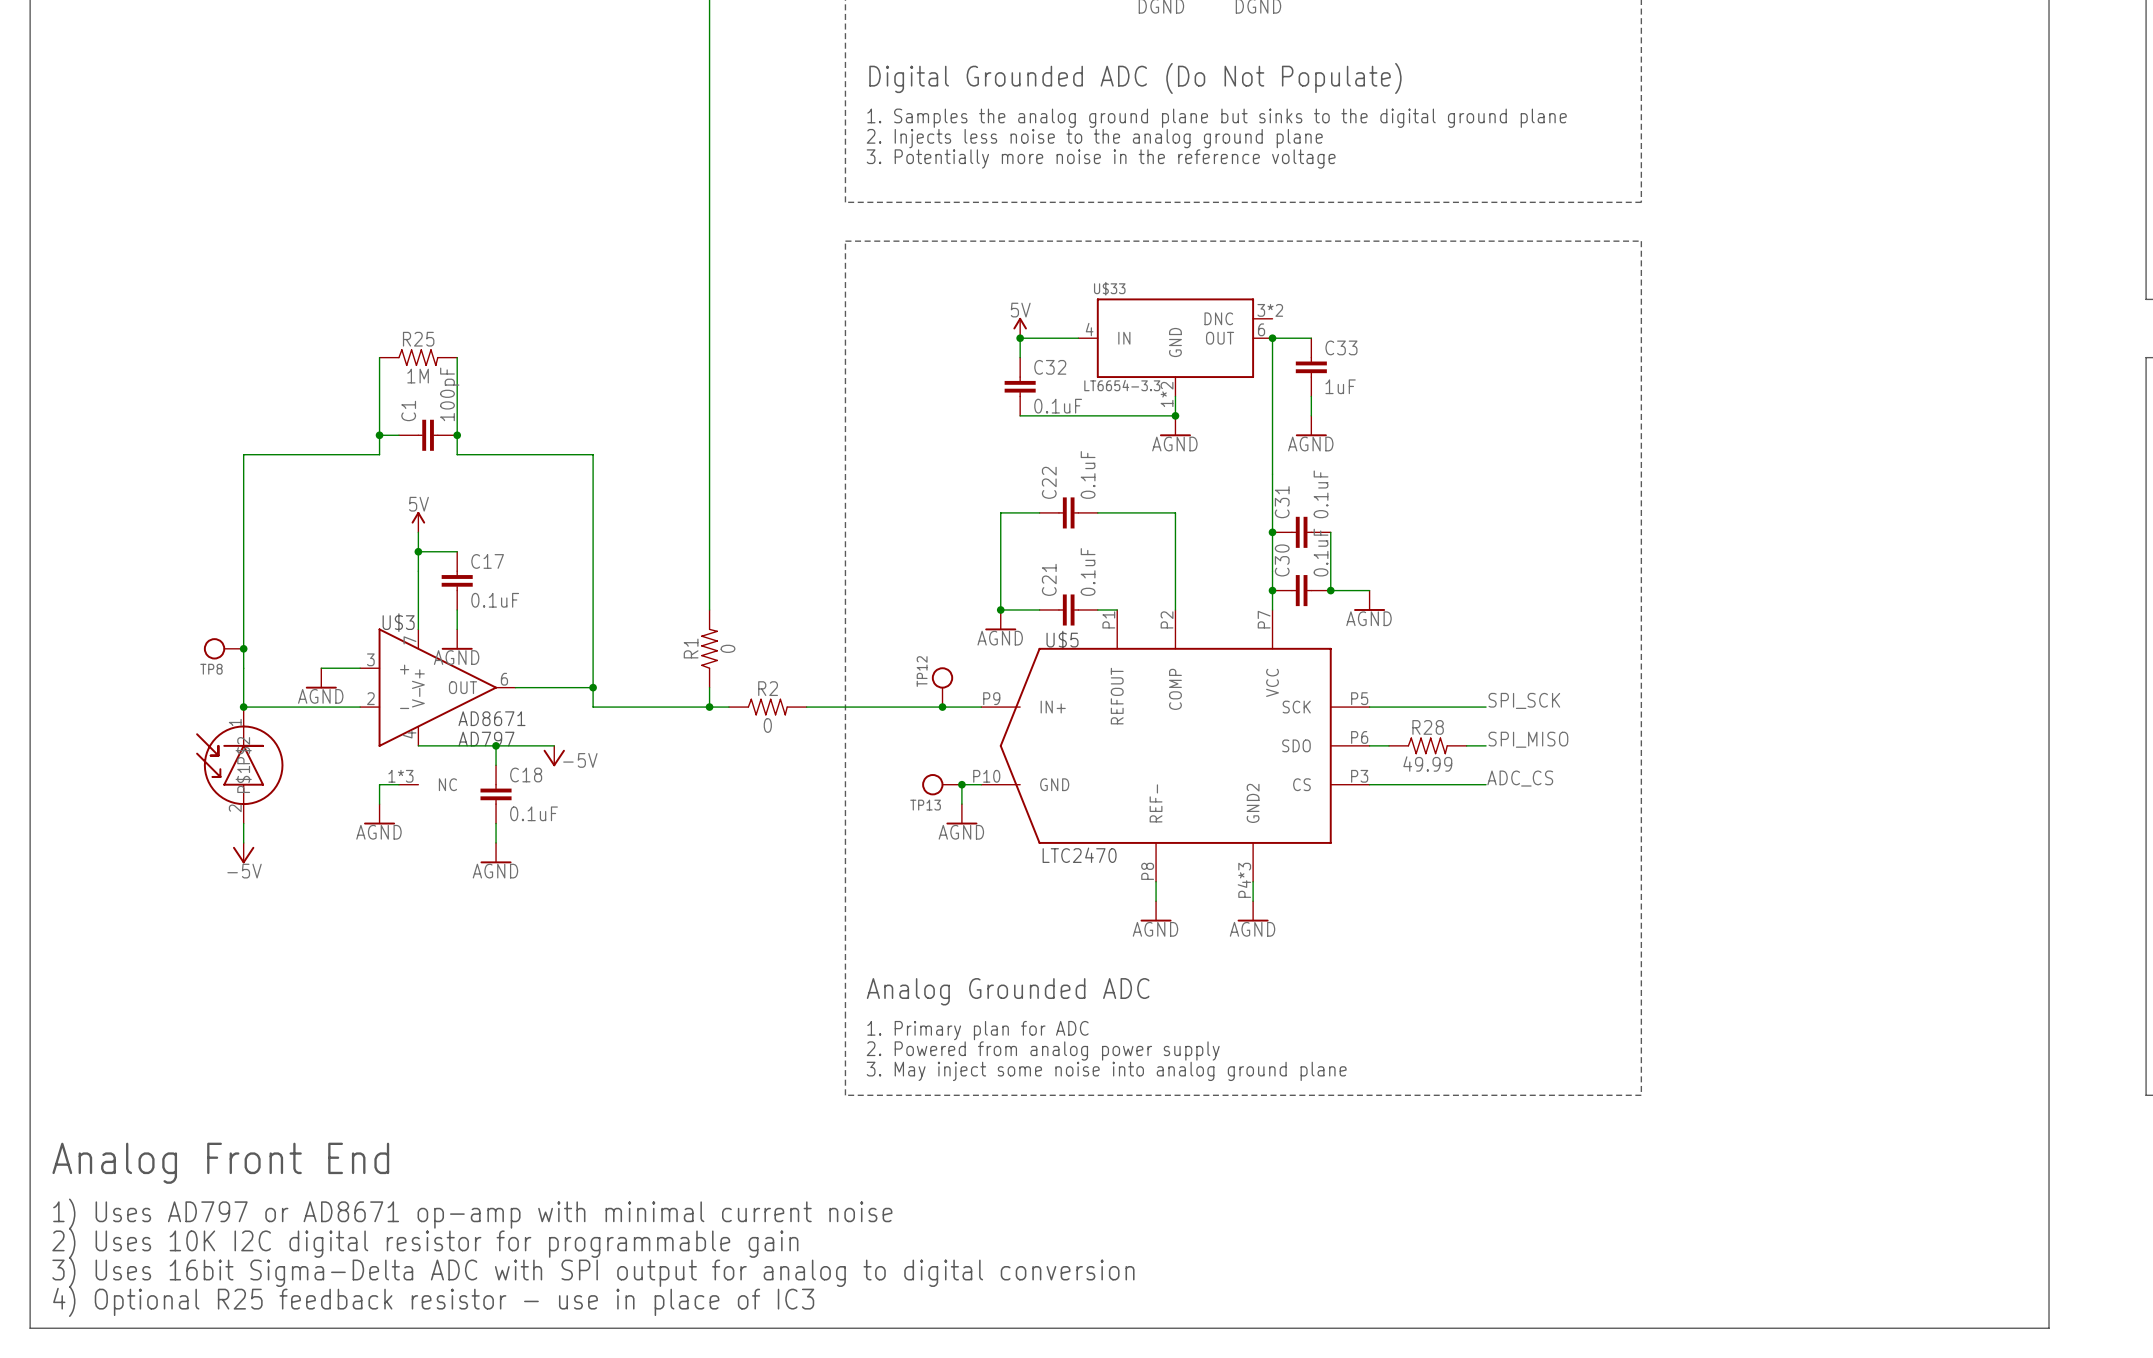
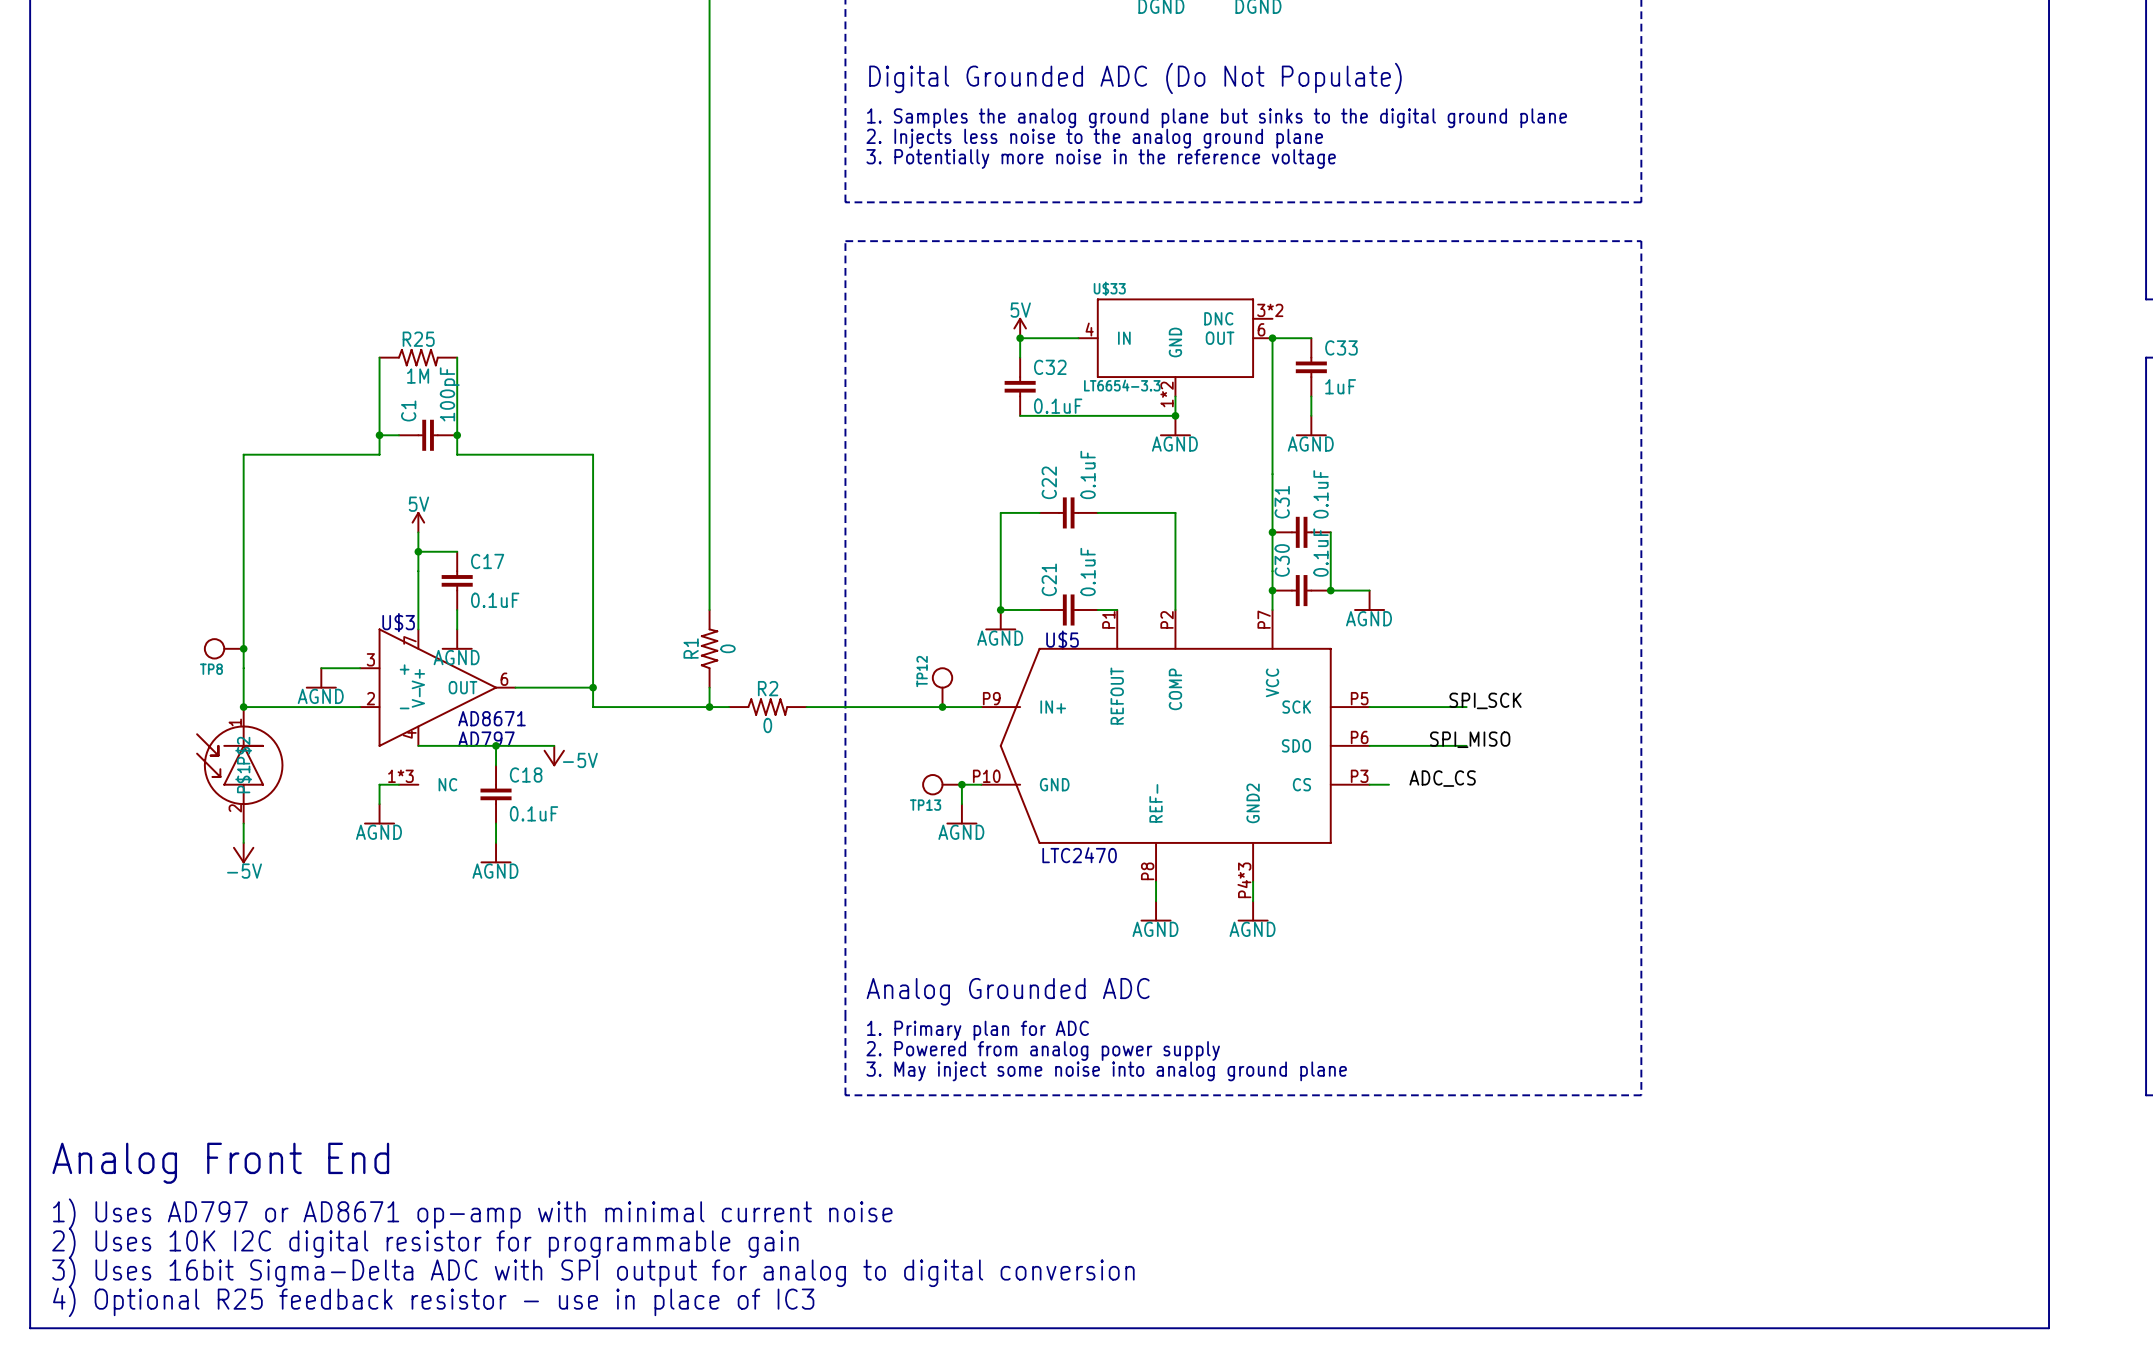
label position: SPI_SCK (1524, 700) -> SPI_SCK (1485, 700)
wire: (1466, 707) (1486, 707) -> none
label position: SPI_MISO (1528, 739) -> SPI_MISO (1470, 739)
R28: 49.99 (1427, 745) -> none
label position: ADC_CS (1520, 778) -> ADC_CS (1442, 778)
wire: (1388, 784) (1486, 784) -> none

